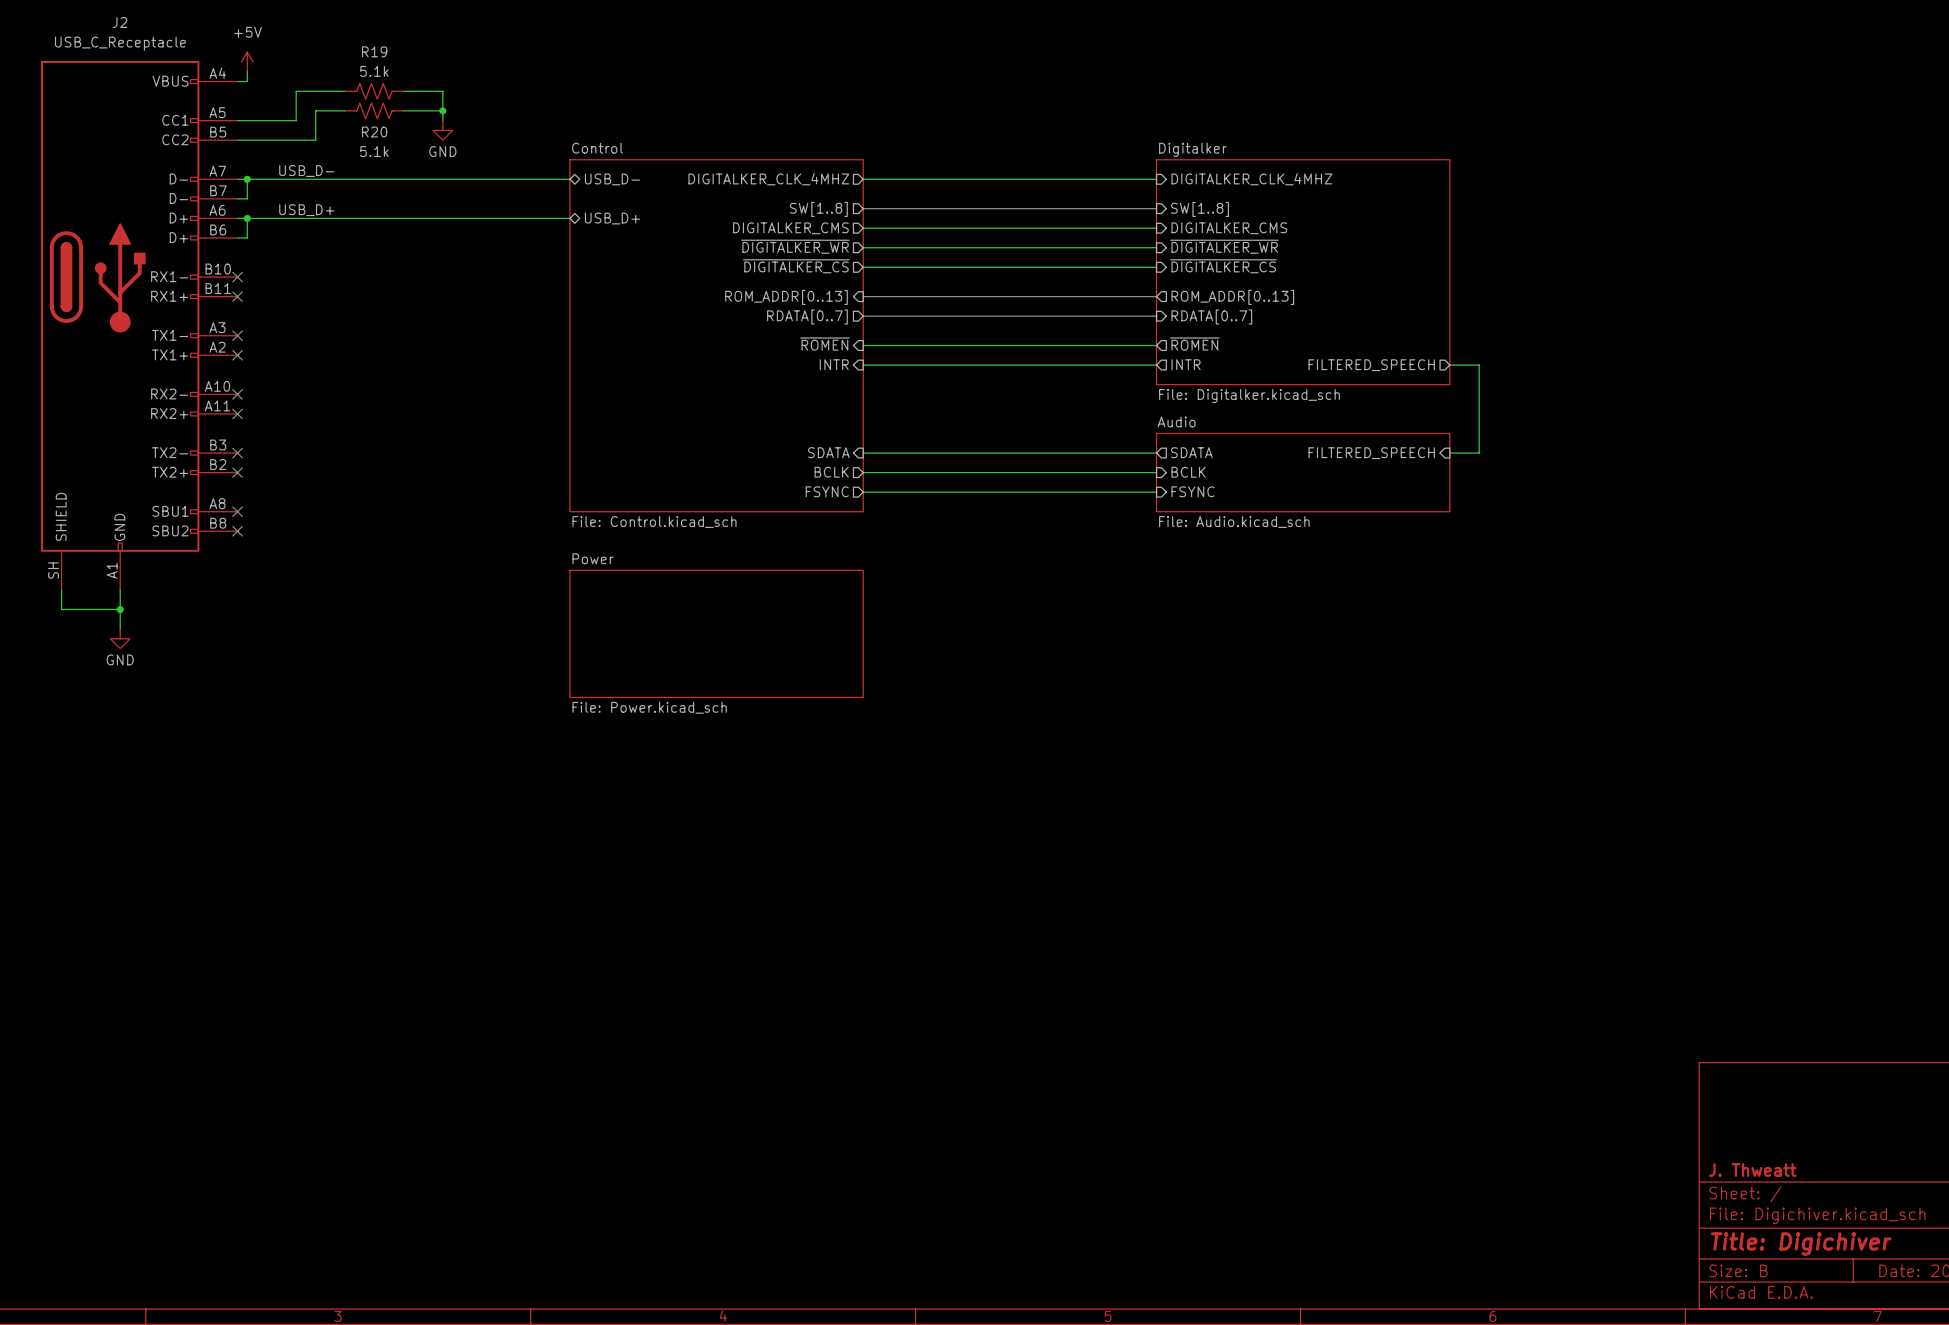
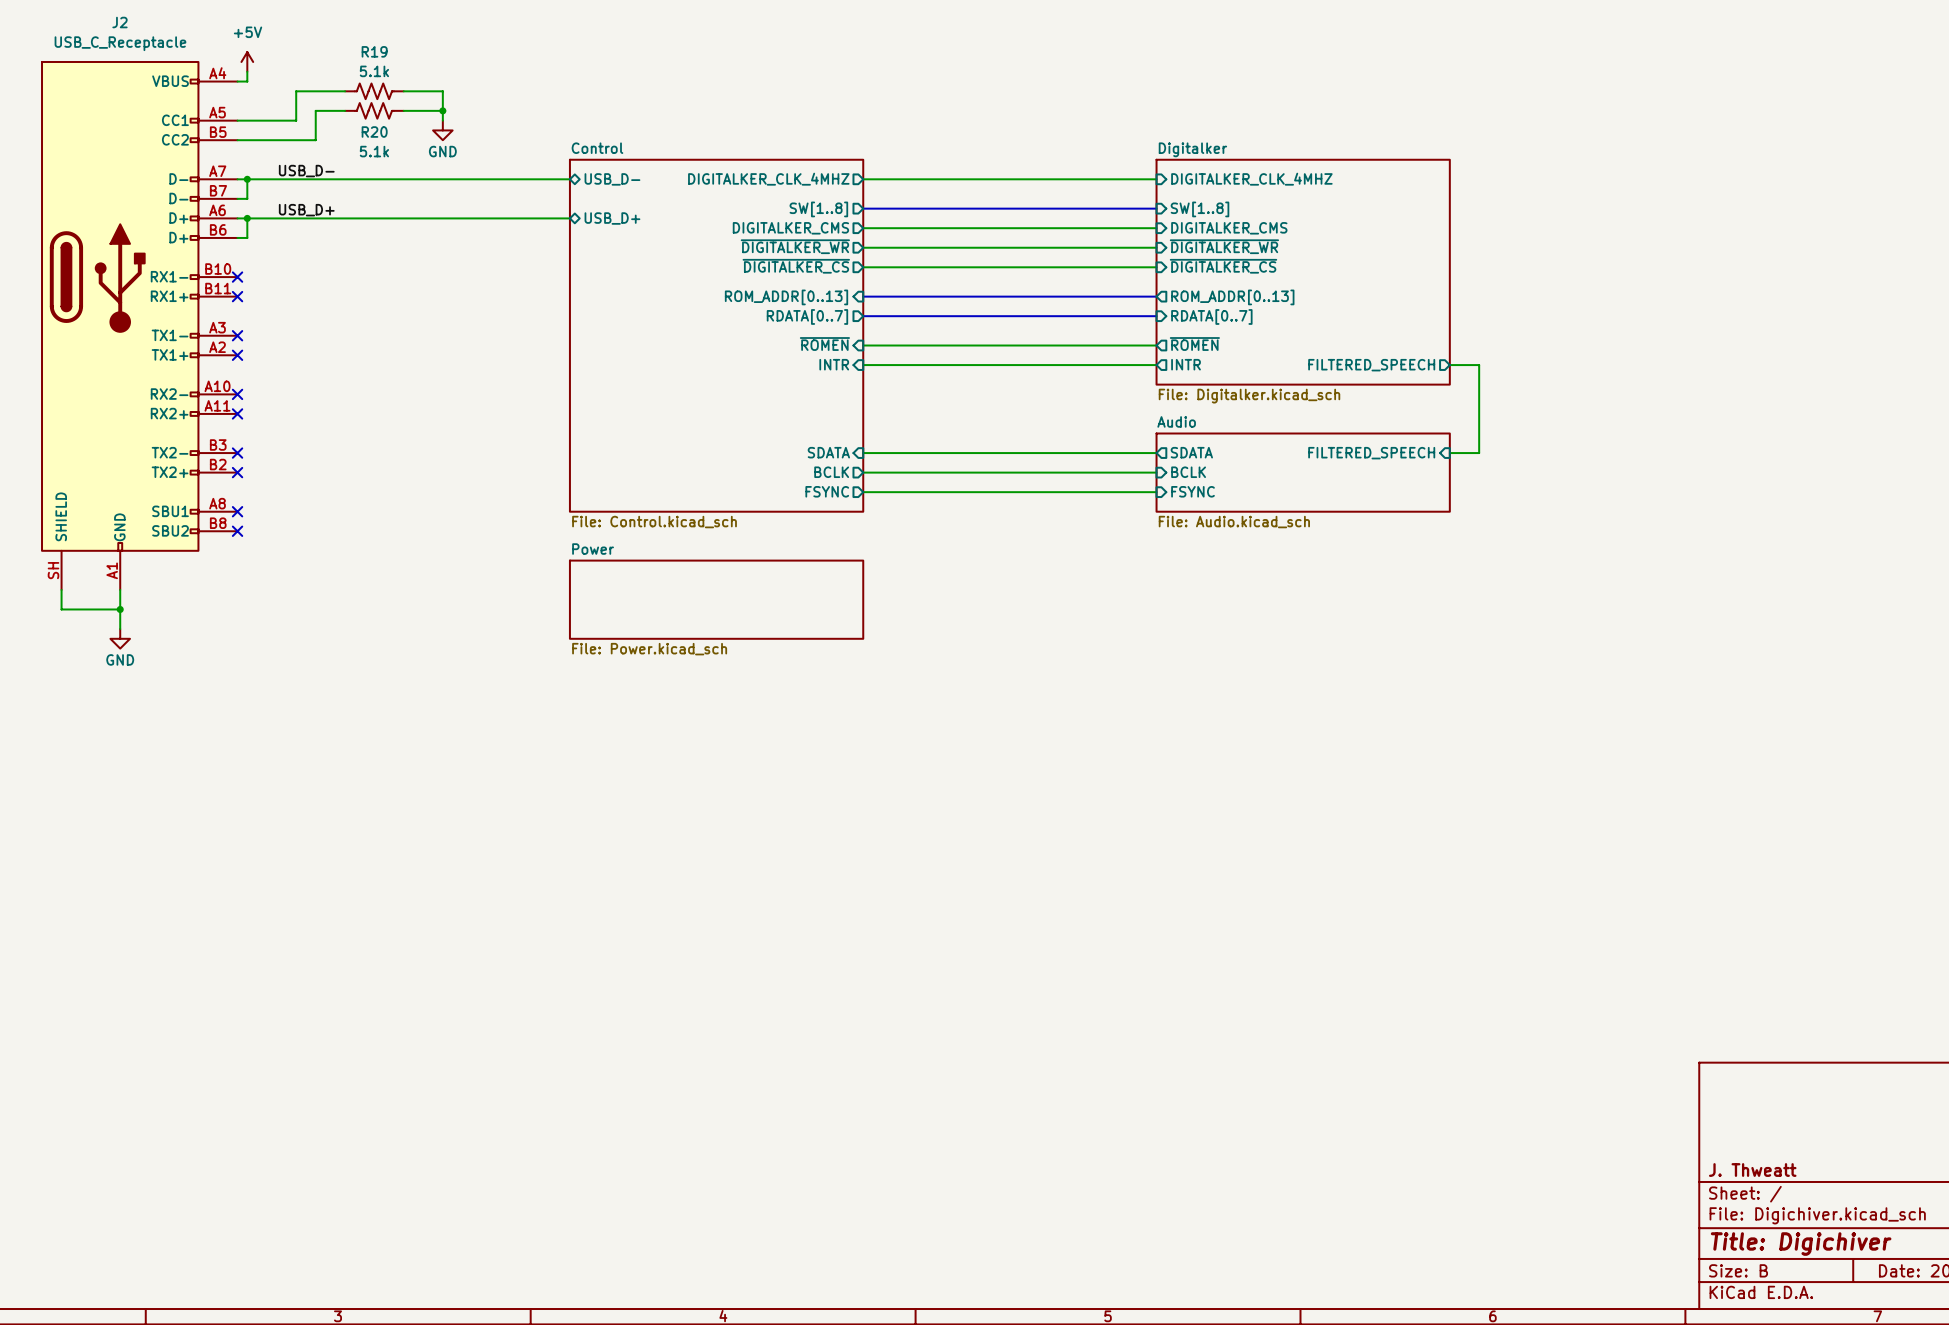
sheet Power: none -> File: Power.kicad_sch (716, 599)
sheet Power: File: Power.kicad_sch (716, 633) -> none

